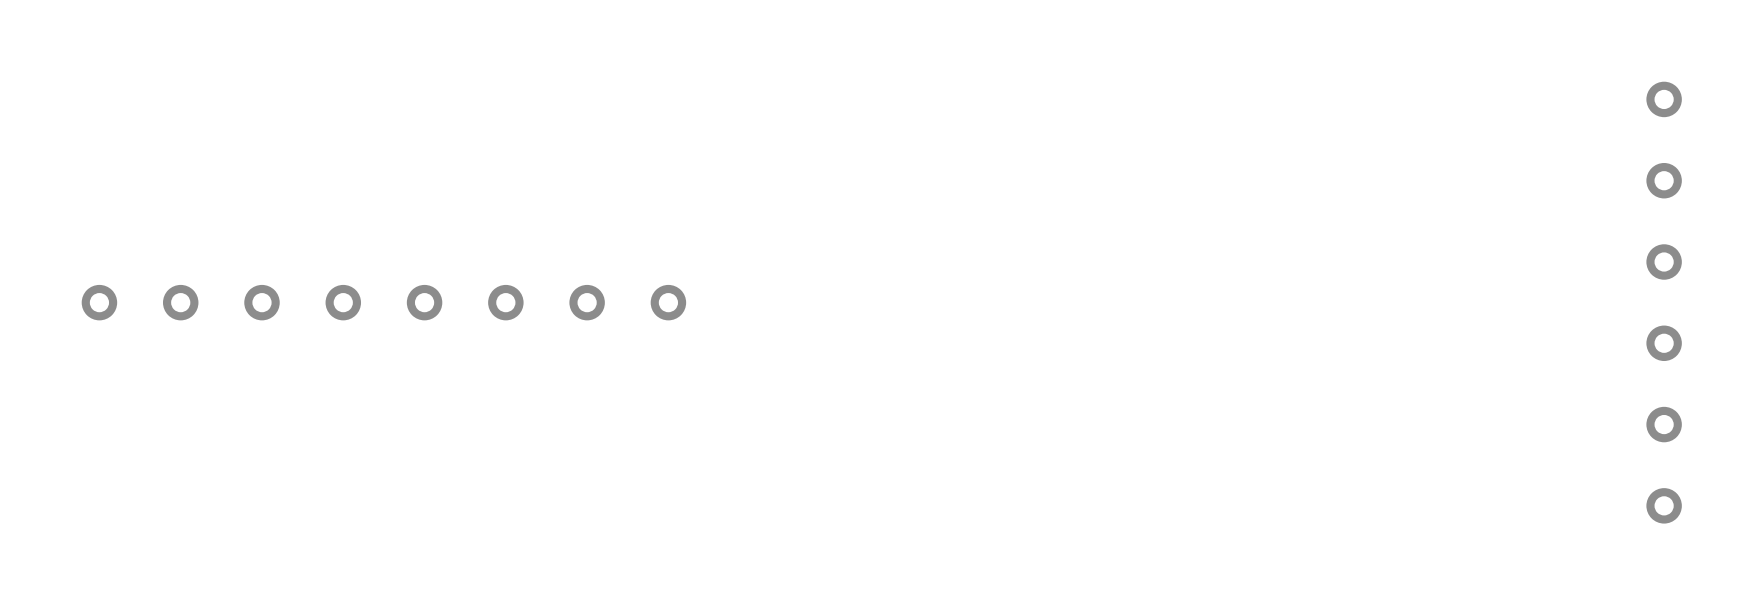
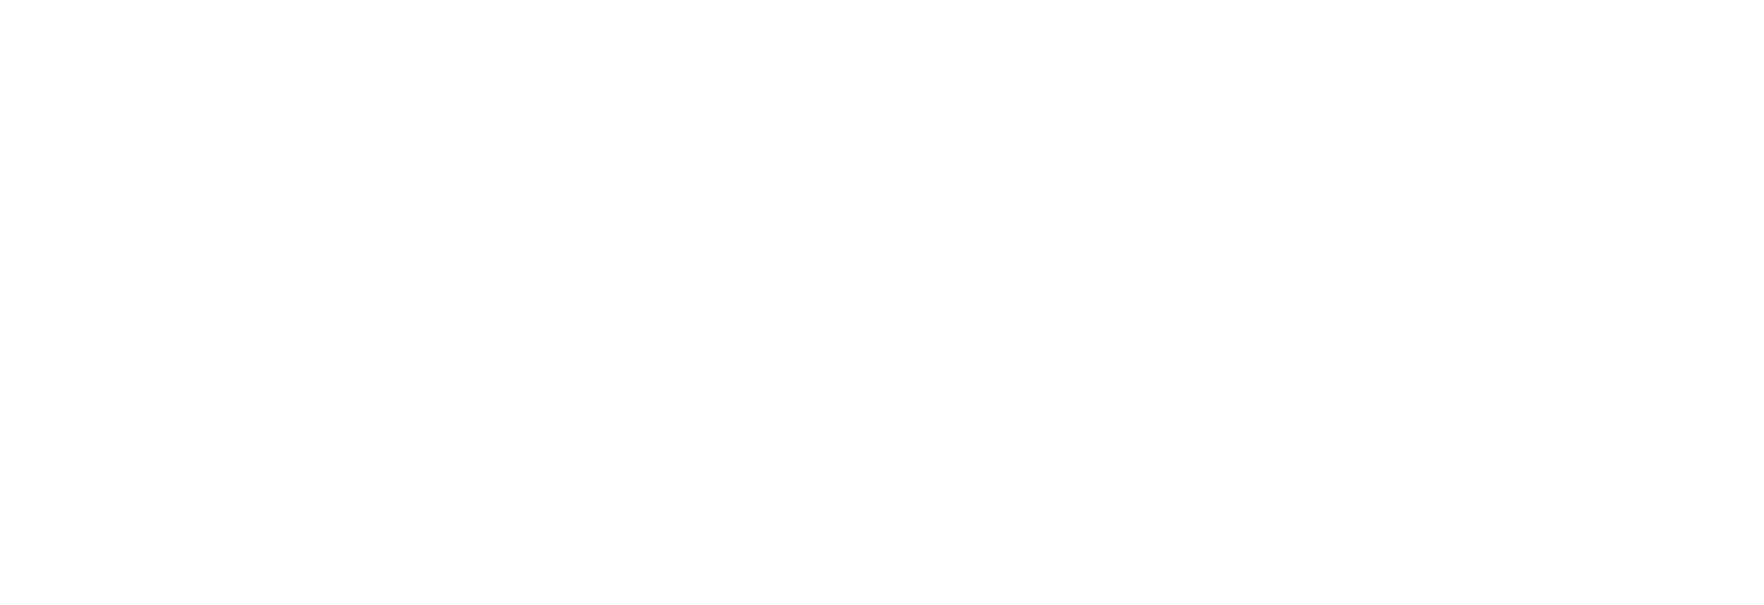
part: (383, 302) -> none
part: (1664, 302) -> none

